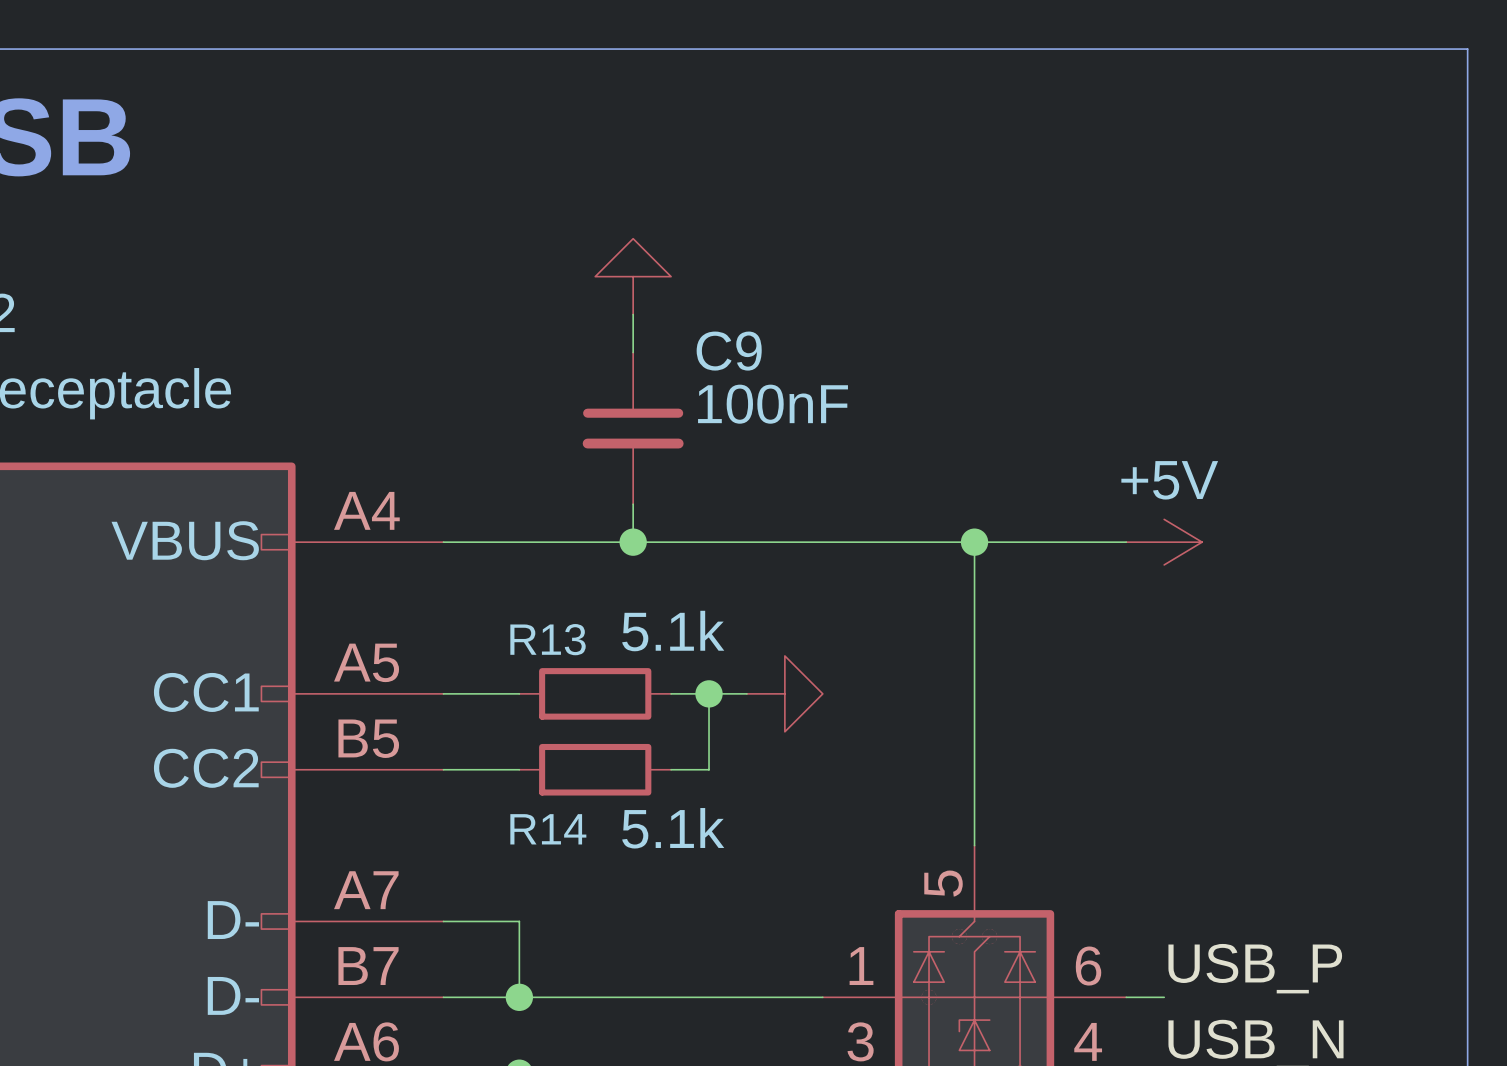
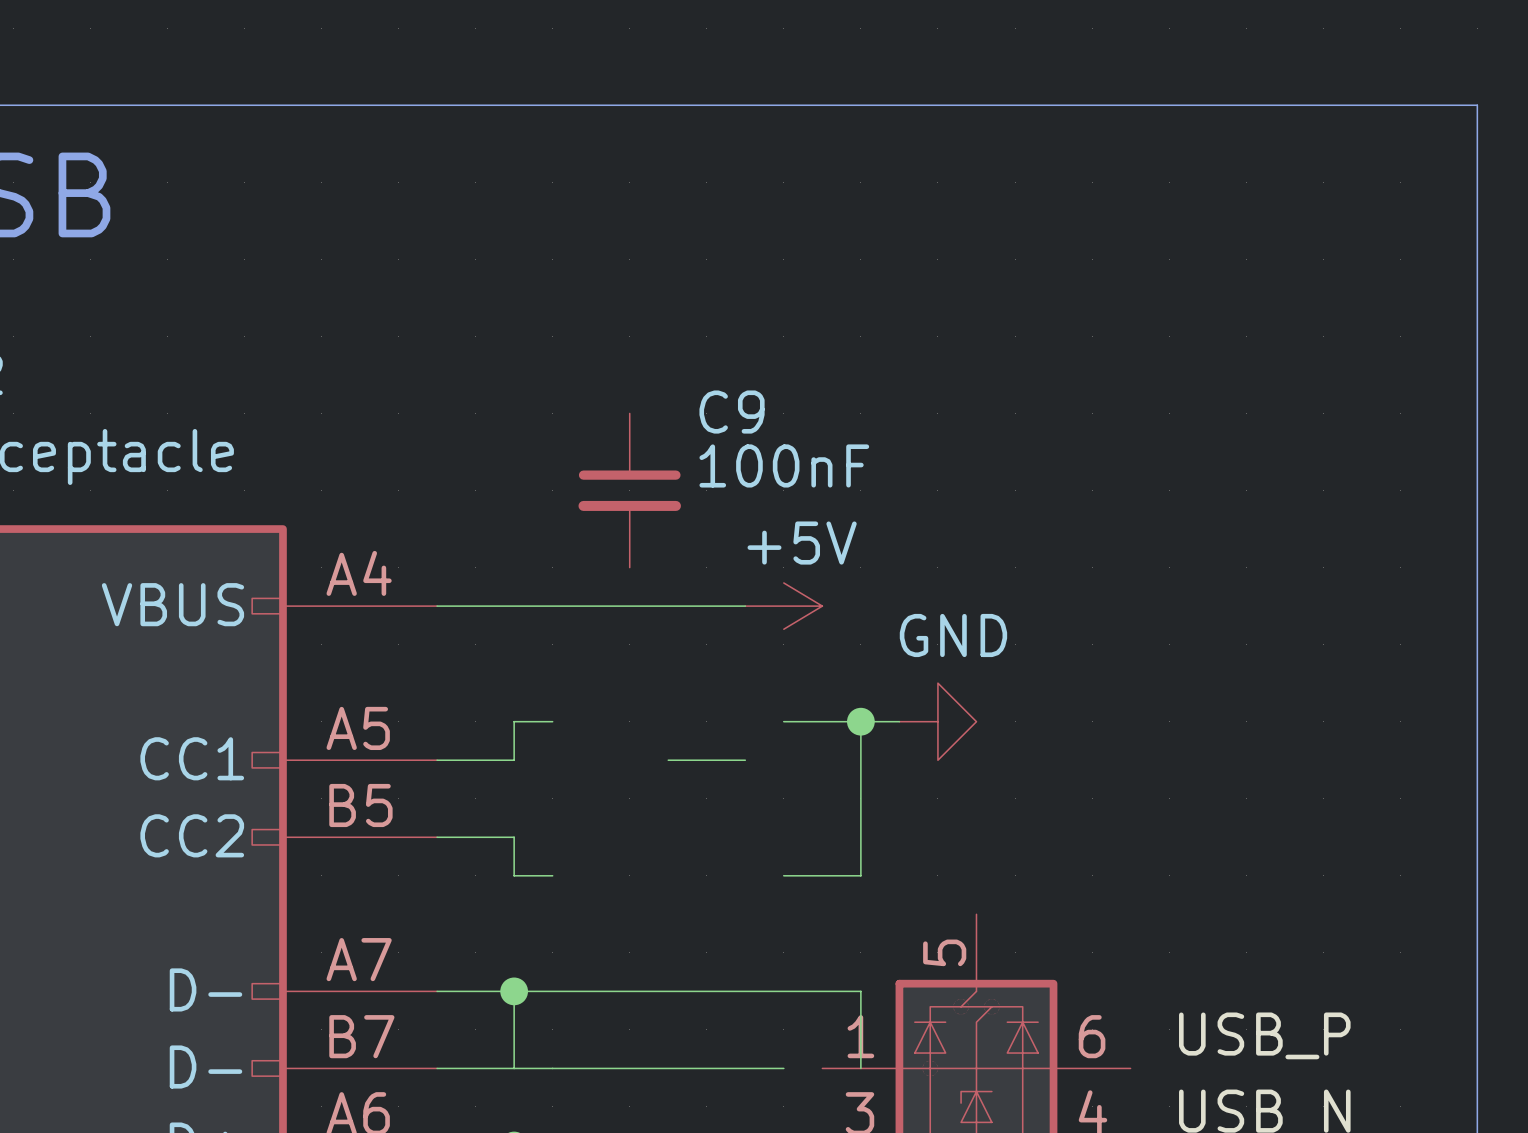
power symbol: (633, 276) -> none
wire: (633, 314) (633, 352) -> none
wire: (633, 504) (633, 542) -> none
junction: (633, 542) -> none
wire: (746, 542) (1126, 542) -> none
wire: (974, 542) (974, 845) -> none
junction: (974, 542) -> none
power symbol position: +5V (1164, 542) -> +5V (783, 606)
wire: none -> (552, 721) (514, 721) (514, 760)
wire: none -> (783, 721) (899, 721)
wire: none -> (860, 721) (860, 875) (783, 875)
junction: none -> (860, 721)
power symbol: none -> GND (937, 721)
R13: 5.1k (595, 693) -> none
wire: (709, 693) (709, 769) (671, 769) -> none
junction: (709, 693) -> none
power symbol: (784, 693) -> none
wire: none -> (514, 837) (514, 875) (552, 875)
R14: 5.1k (595, 769) -> none
wire: none -> (514, 991) (860, 991) (860, 1068)
junction position: (519, 997) -> (514, 991)
wire: (784, 997) (822, 997) -> none
wire: (1126, 997) (1164, 997) -> none

